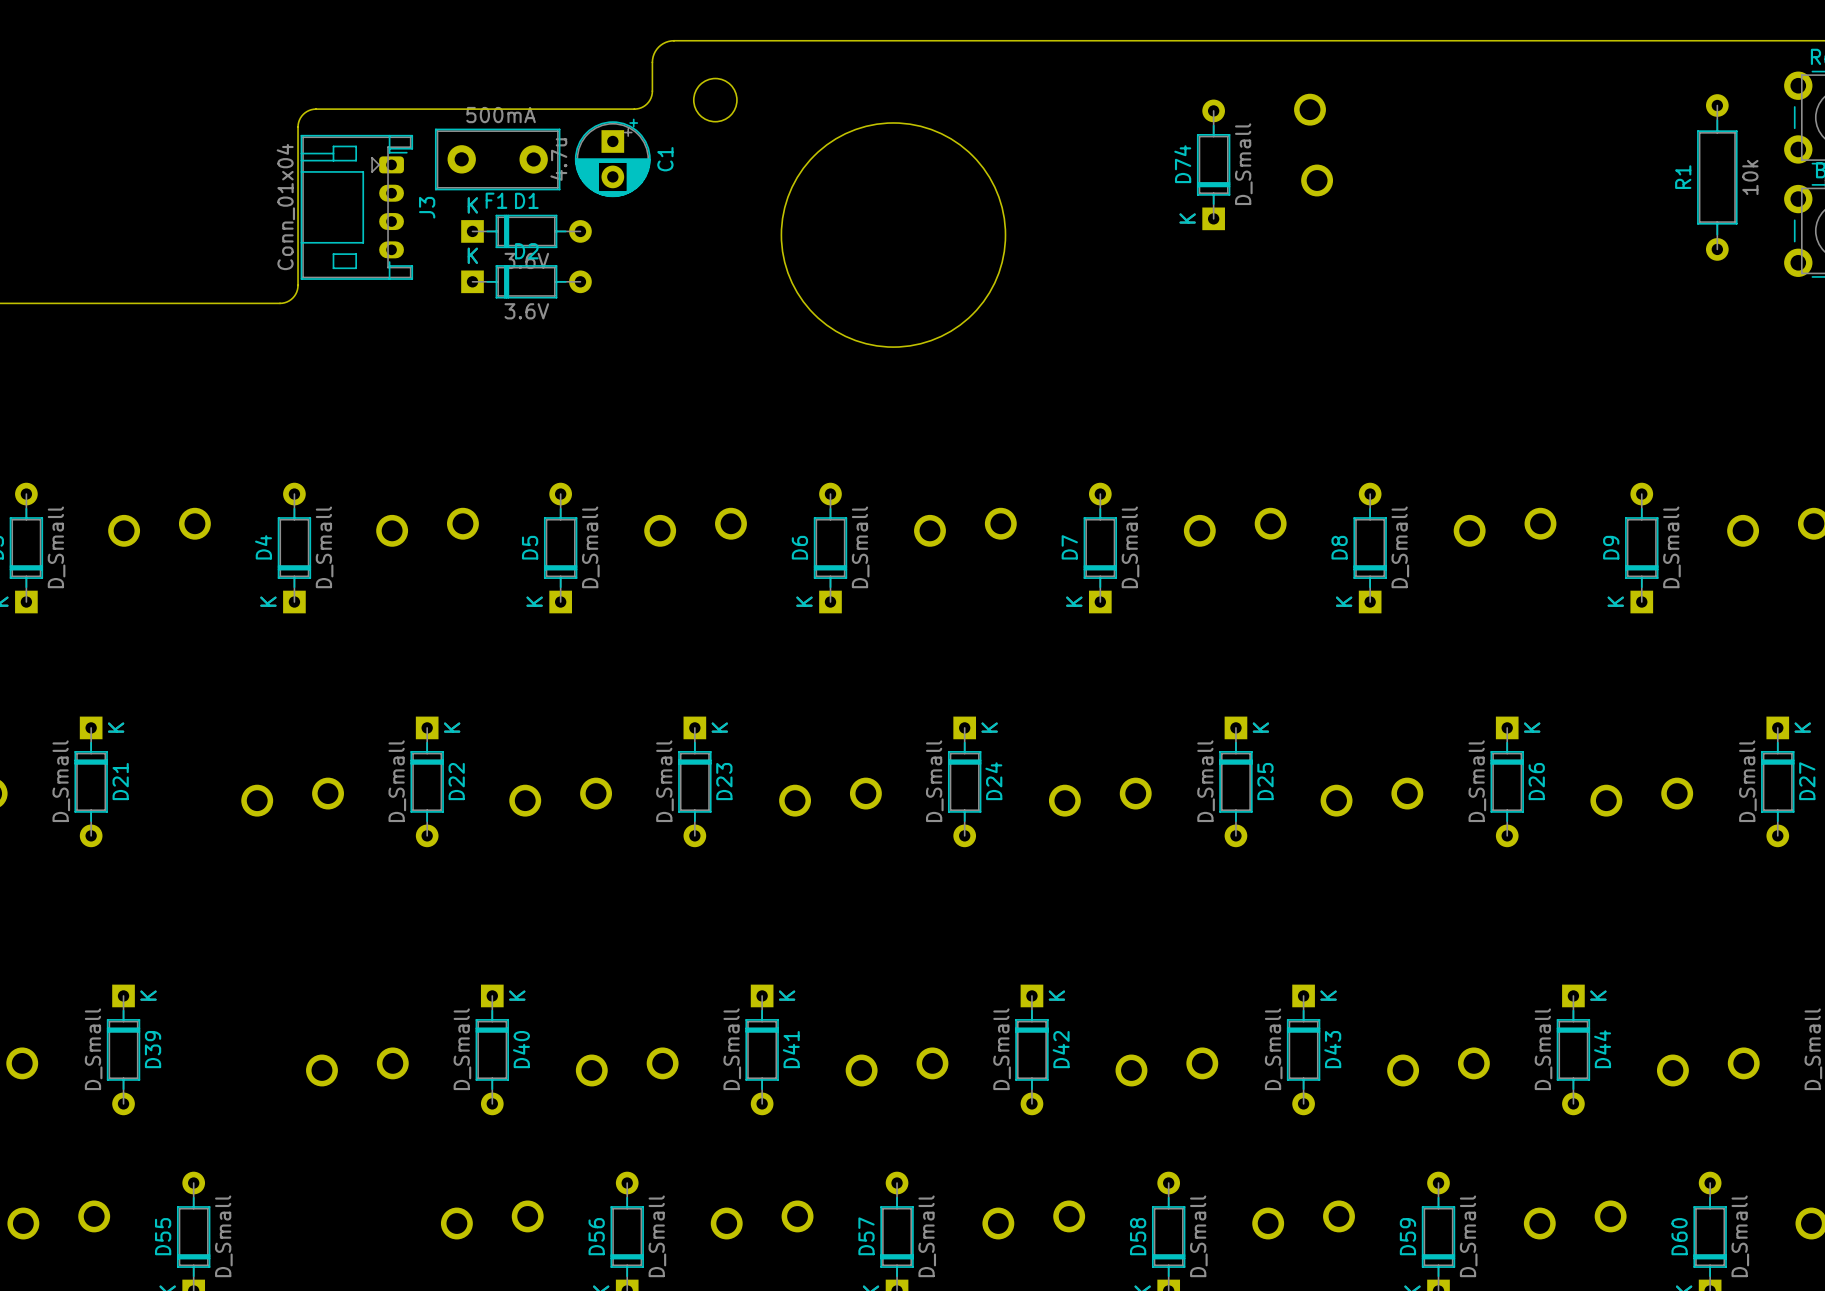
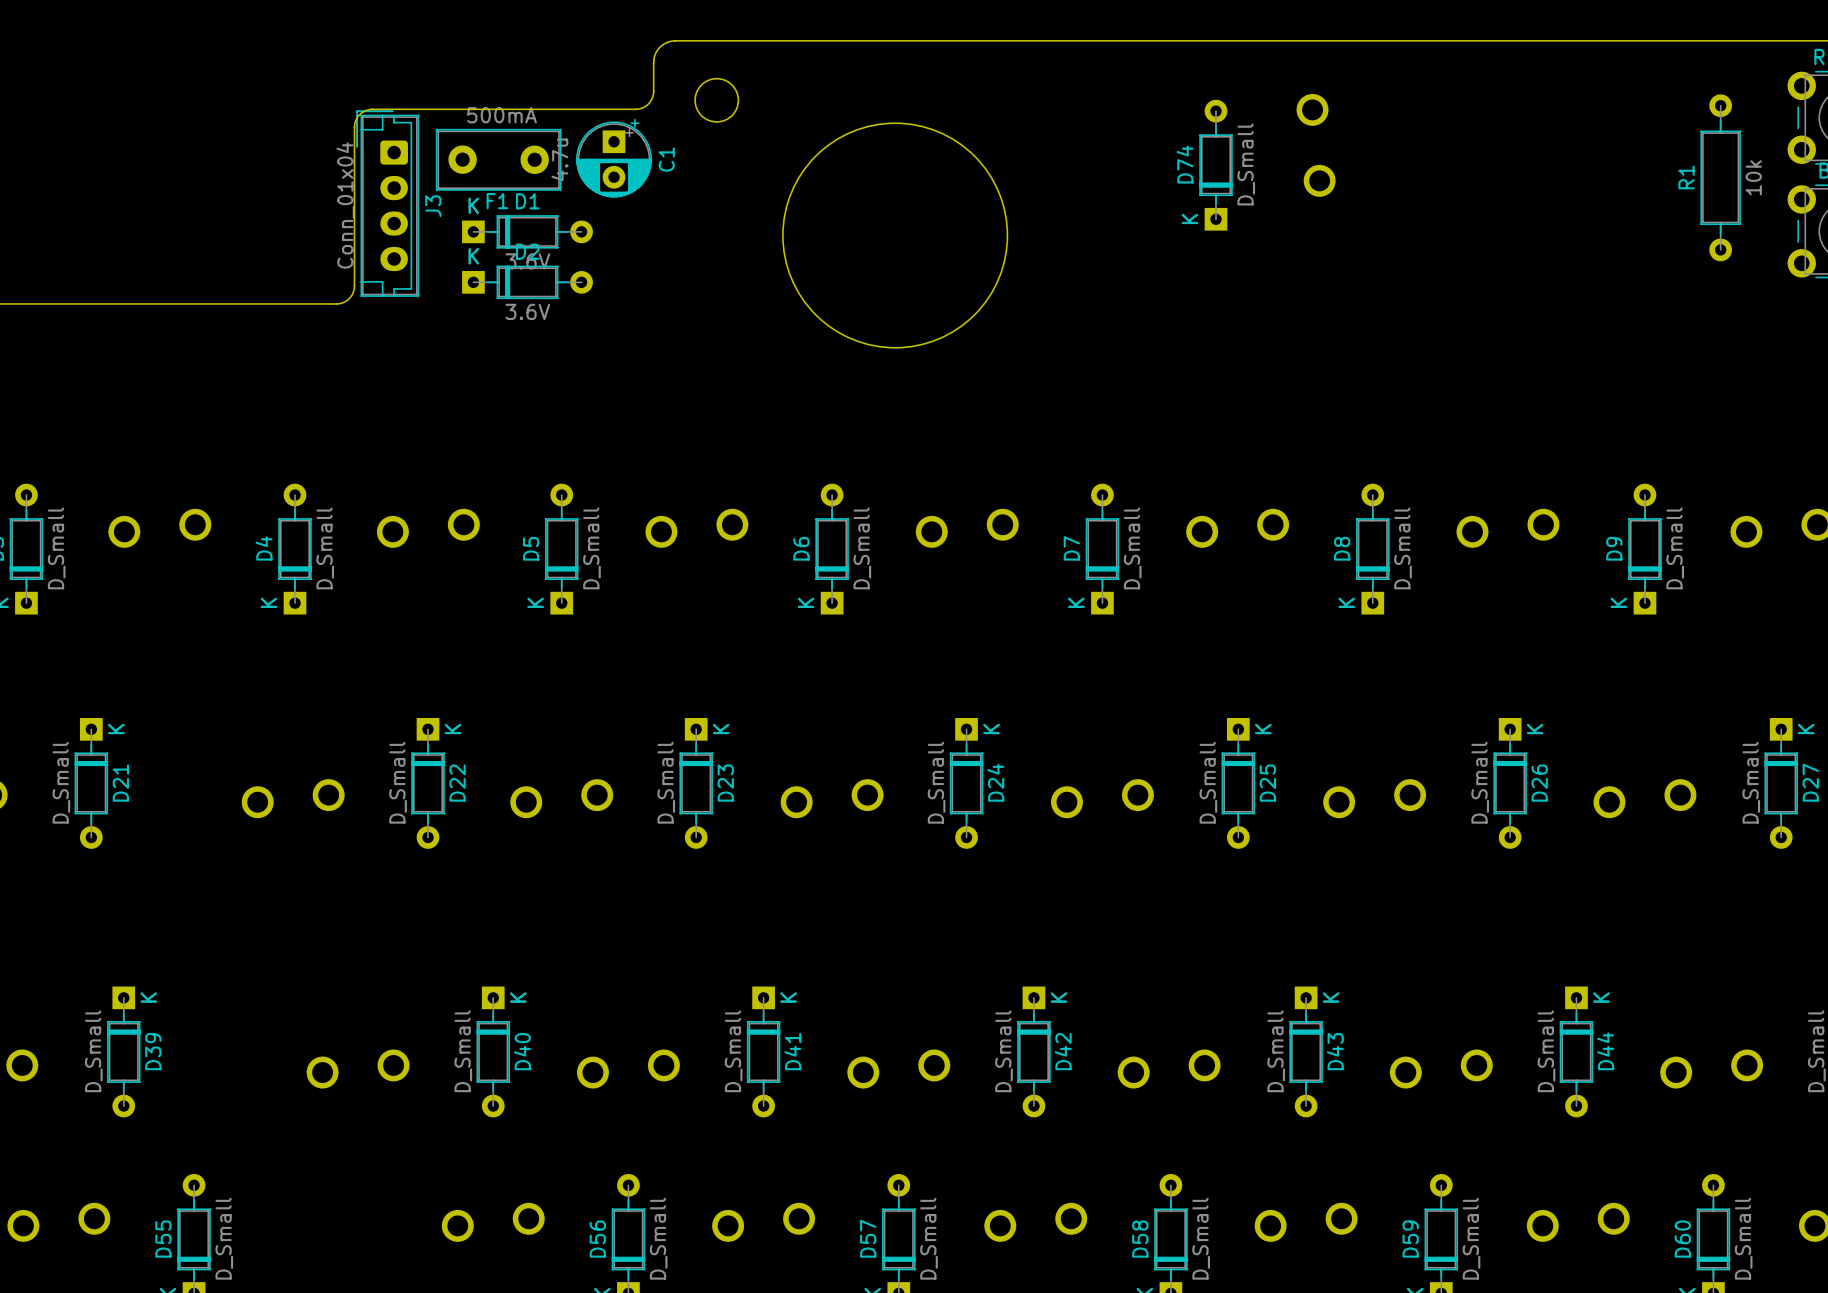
board edge: (371, 109) (313, 109) (305, 112) (299, 120) (297, 287) (290, 299) (280, 303) -> (372, 109) (361, 113) (354, 124) (353, 292) (347, 300) (338, 303) (280, 303)
J3 footprint: [300, 134, 414, 280] -> [356, 110, 420, 297]
J3 value position: Conn_01x04 (285, 207) -> Conn_01x04 (345, 205)

